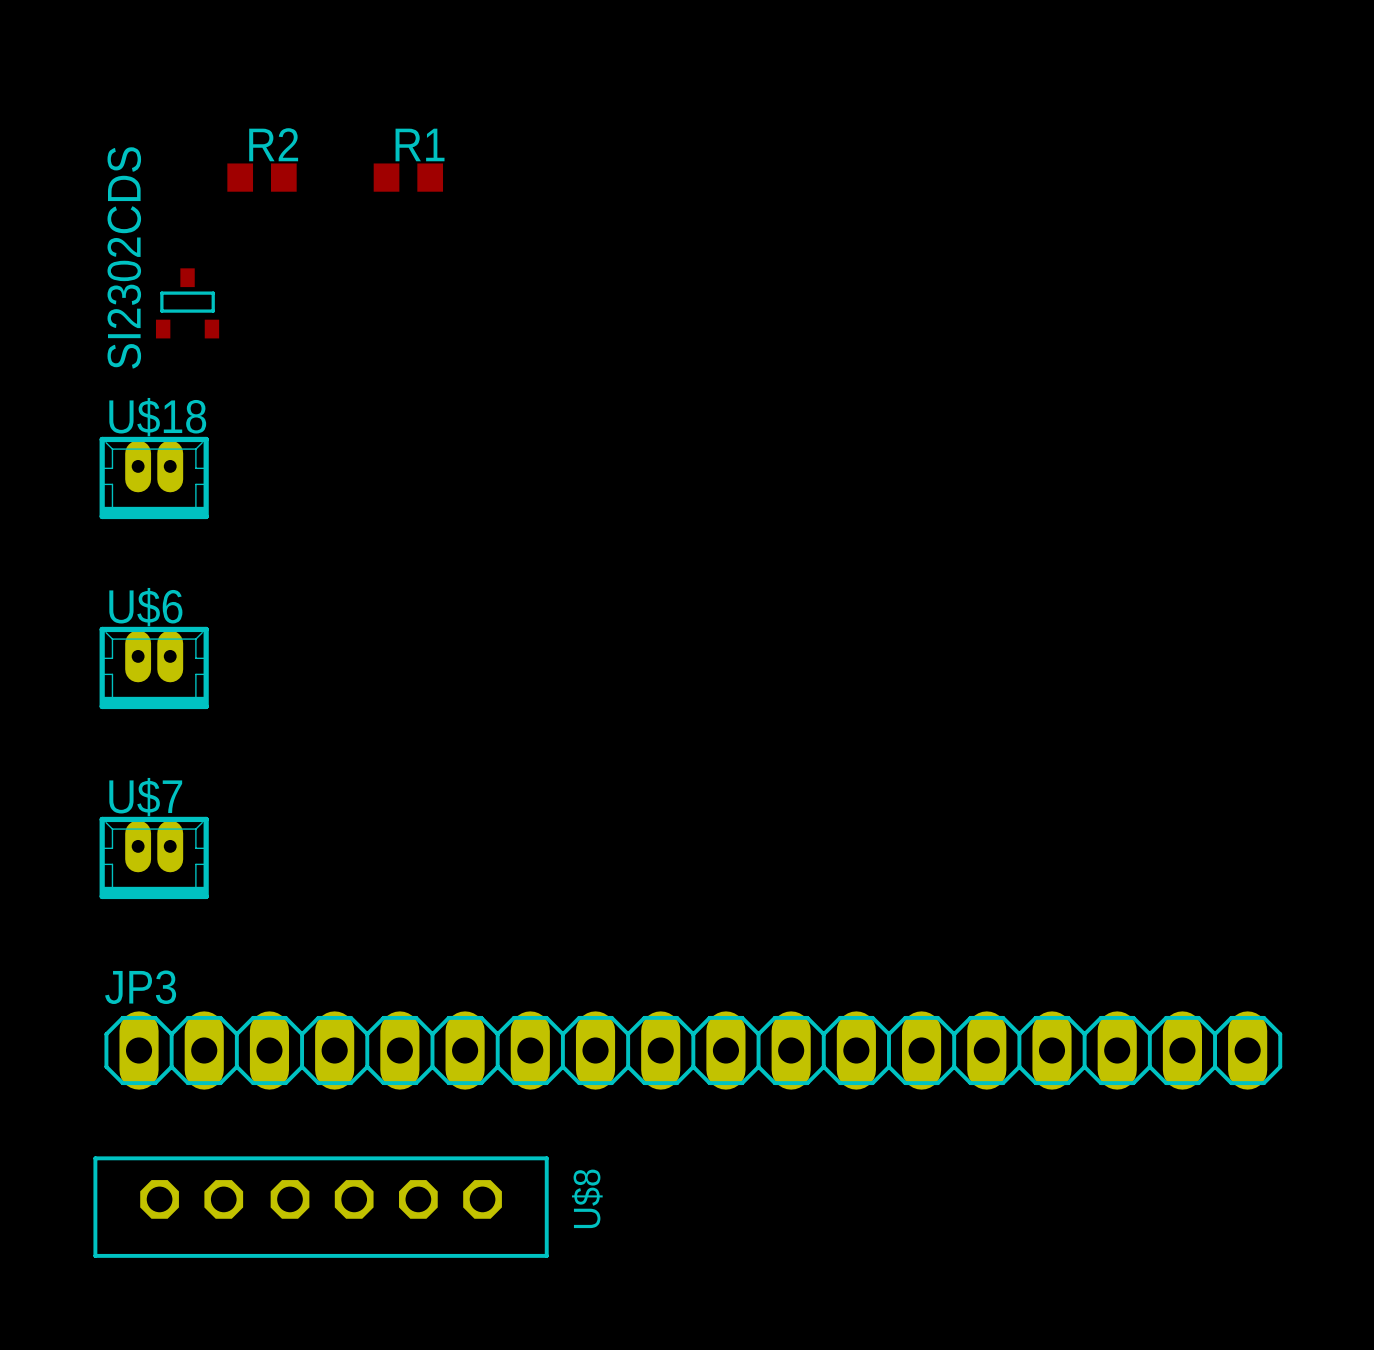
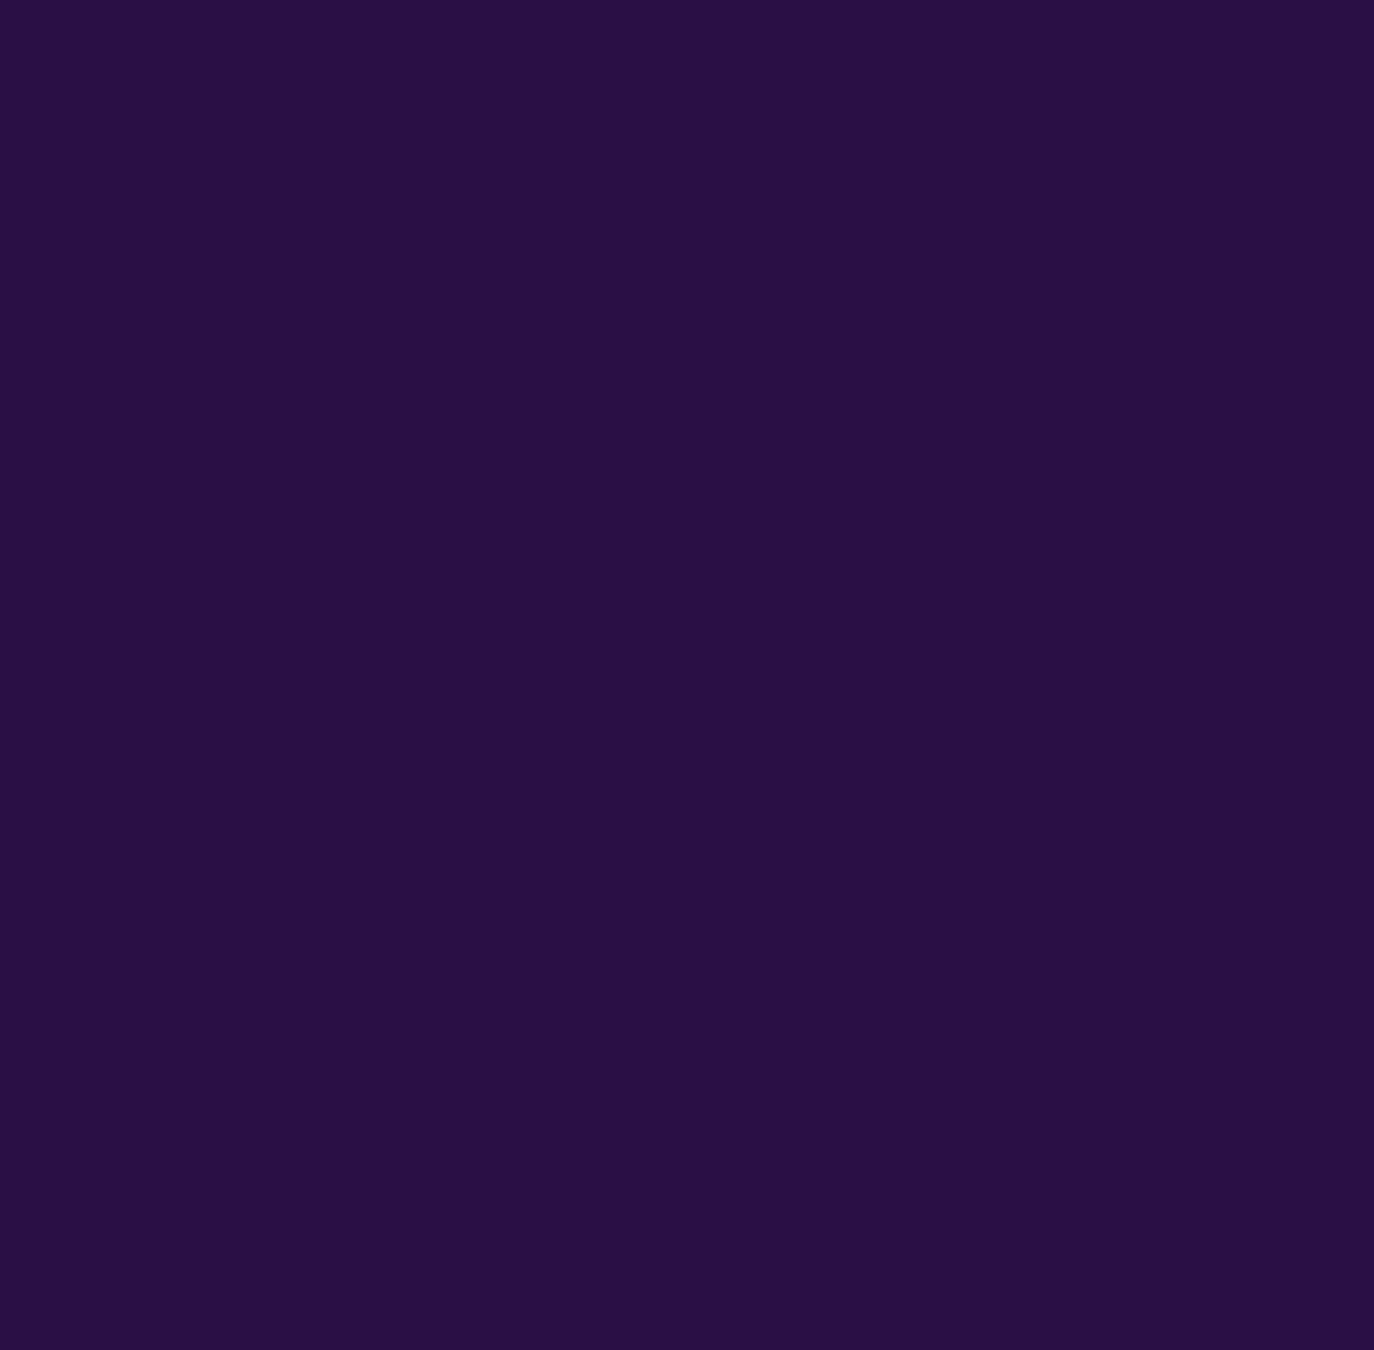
R2: (262, 177) -> none
R1: (408, 177) -> none
SI2302CDS: (187, 303) -> none
U$18: (154, 477) -> none
U$6: (154, 667) -> none
U$7: (154, 857) -> none
JP3: (693, 1050) -> none
U$8: (321, 1207) -> none

